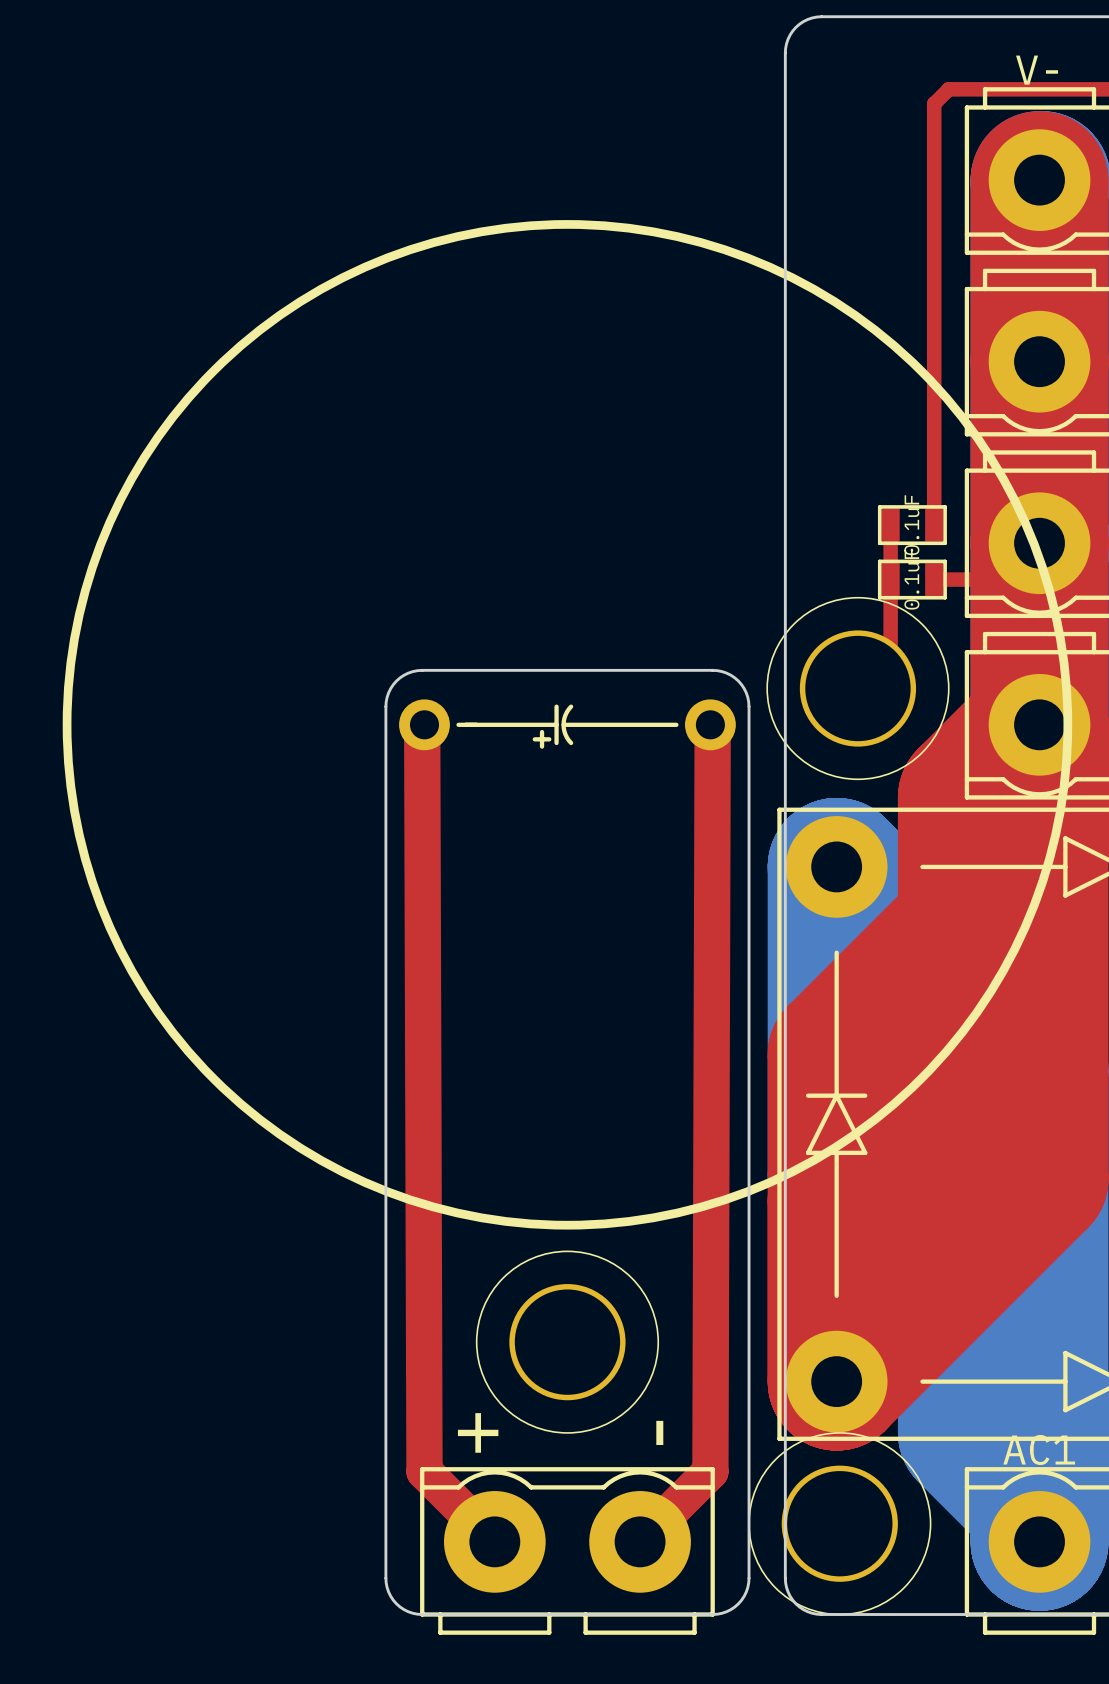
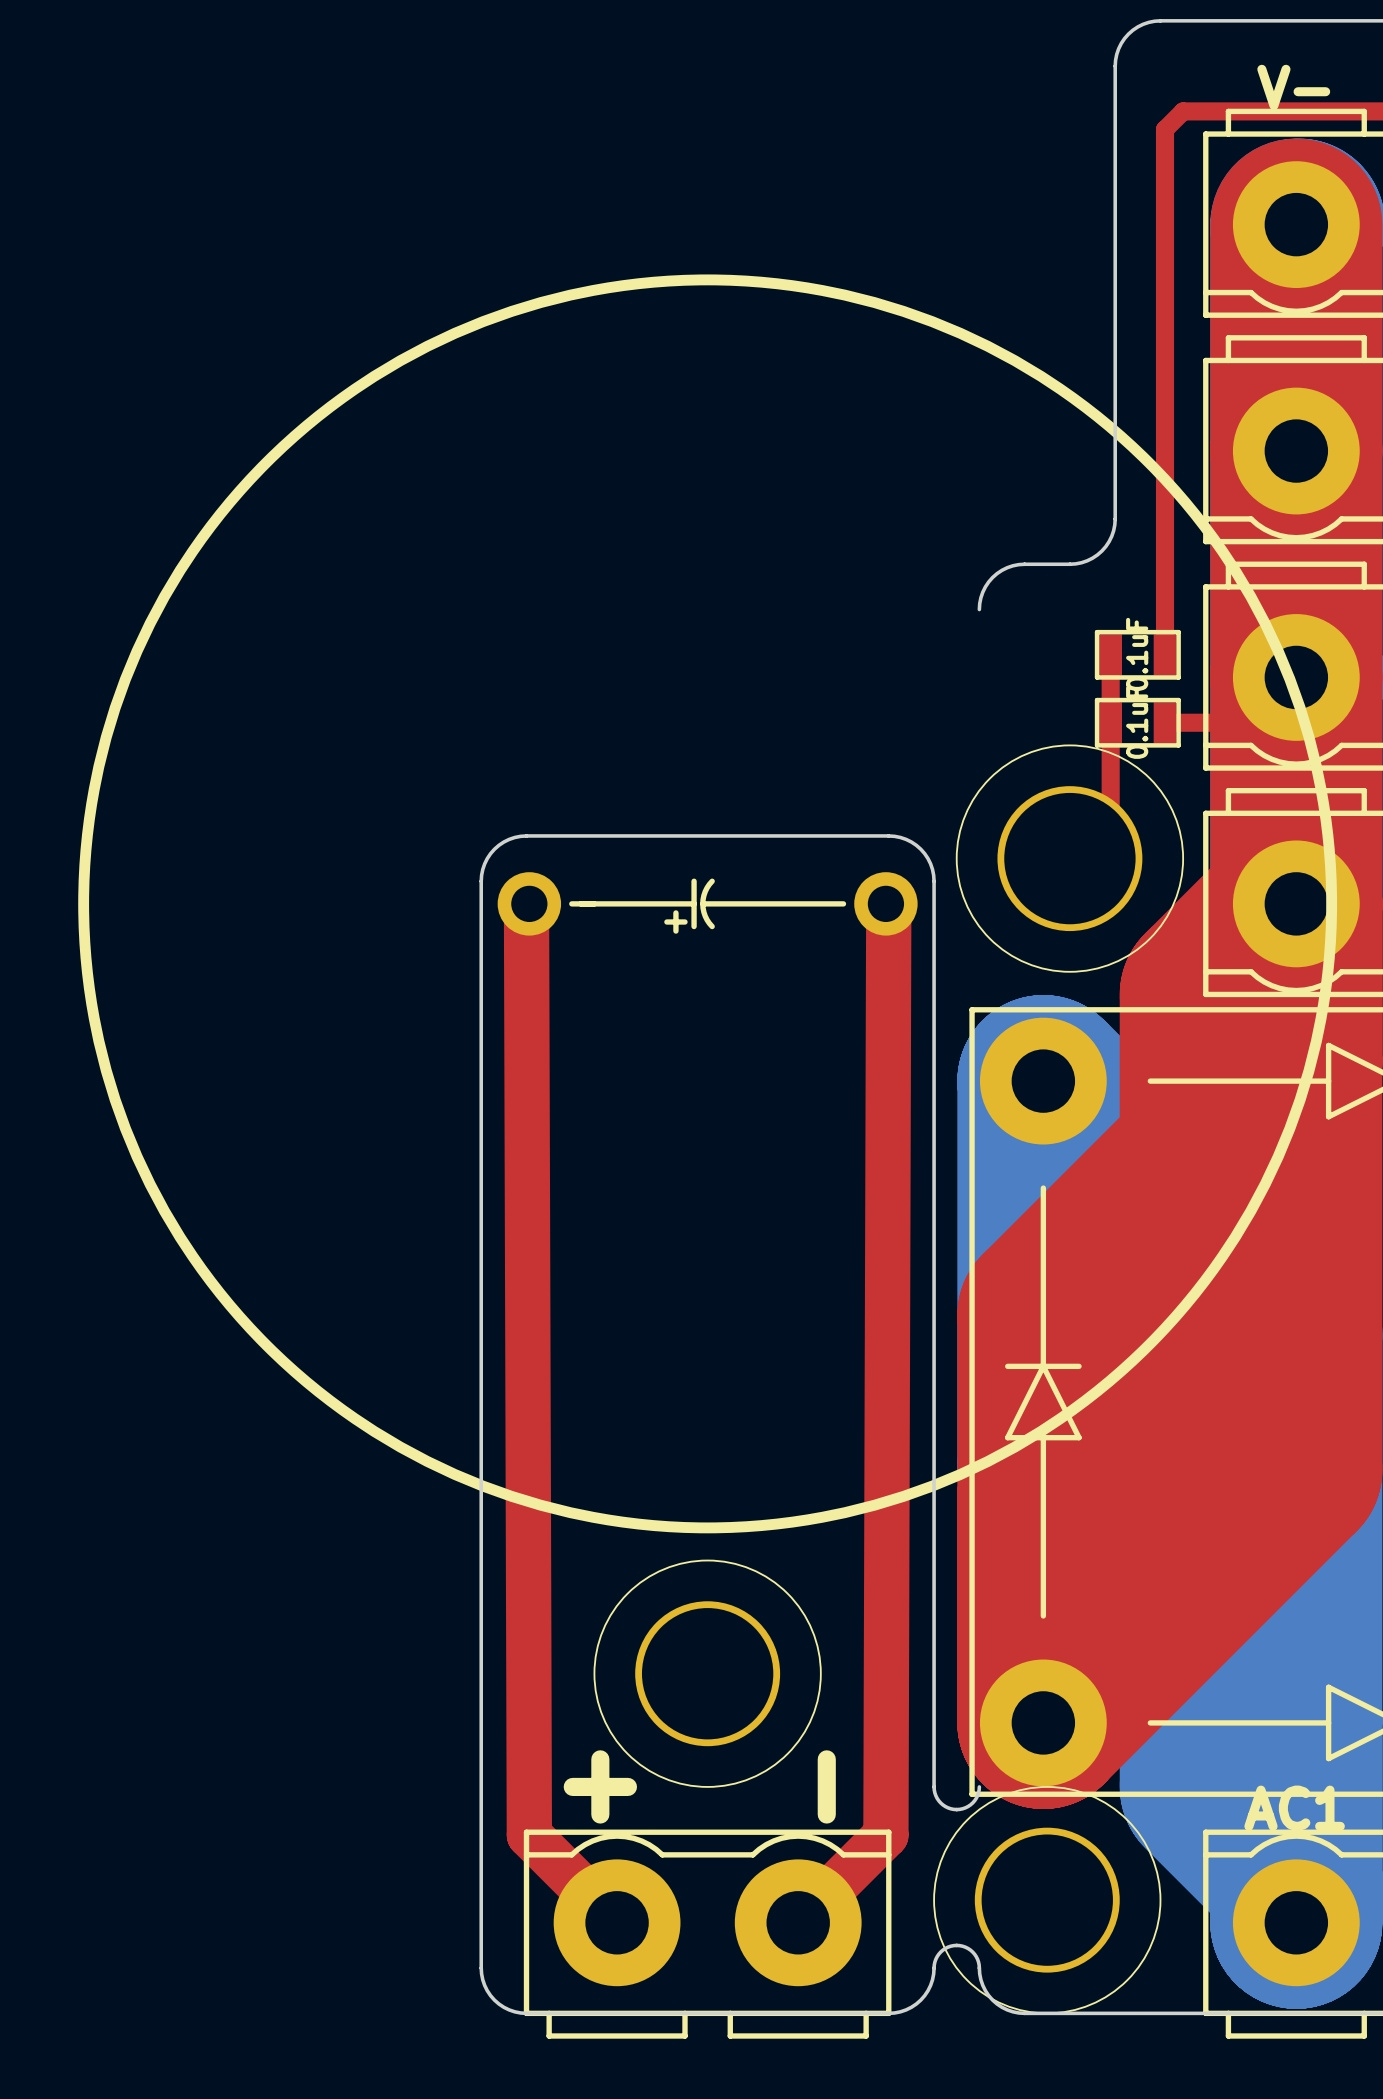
board edge: (930, 16) (812, 17) (795, 27) (788, 39) (785, 48) (785, 1578) -> (1160, 20) (1148, 22) (1132, 30) (1121, 43) (1115, 60) (1113, 530) (1109, 541) (1101, 550) (1087, 560) (1069, 564) (1018, 564) (1001, 570) (992, 577) (985, 586) (980, 597) (979, 609)
board edge: (749, 1432) (749, 1578) -> (934, 1786) (935, 1795) (940, 1802) (948, 1807) (956, 1809)
board edge: none -> (979, 1786) (977, 1795) (972, 1802) (965, 1807) (956, 1809)
board edge: none -> (934, 1968) (935, 1959) (940, 1952) (948, 1947) (956, 1945) (965, 1947) (972, 1952) (977, 1959) (979, 1968)

